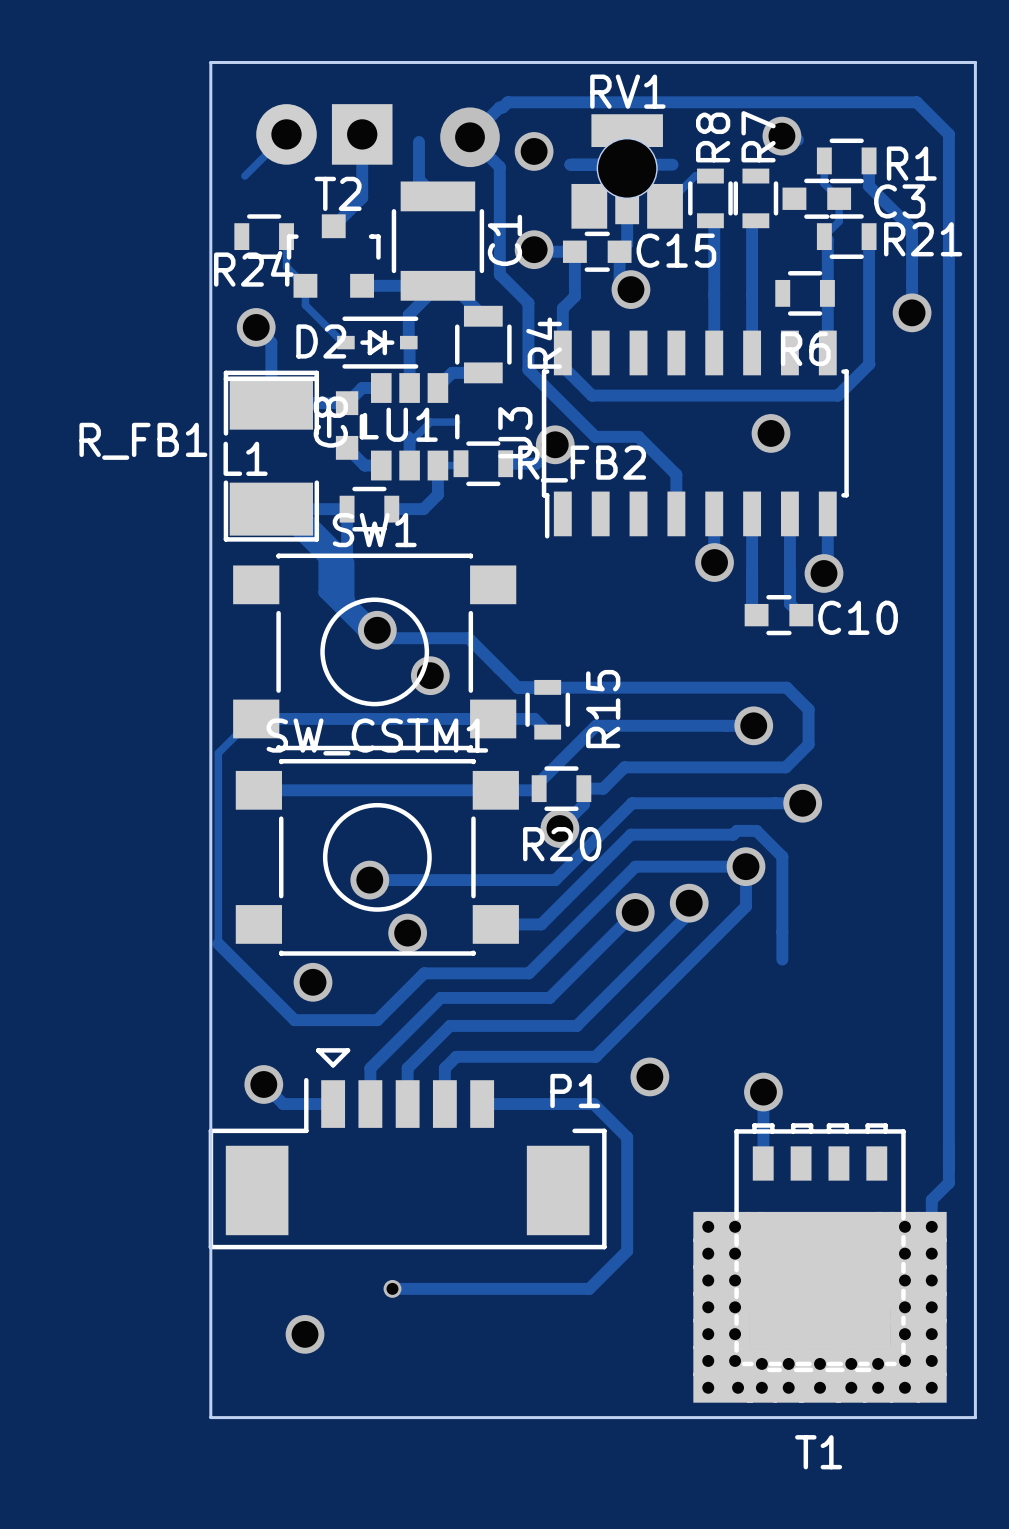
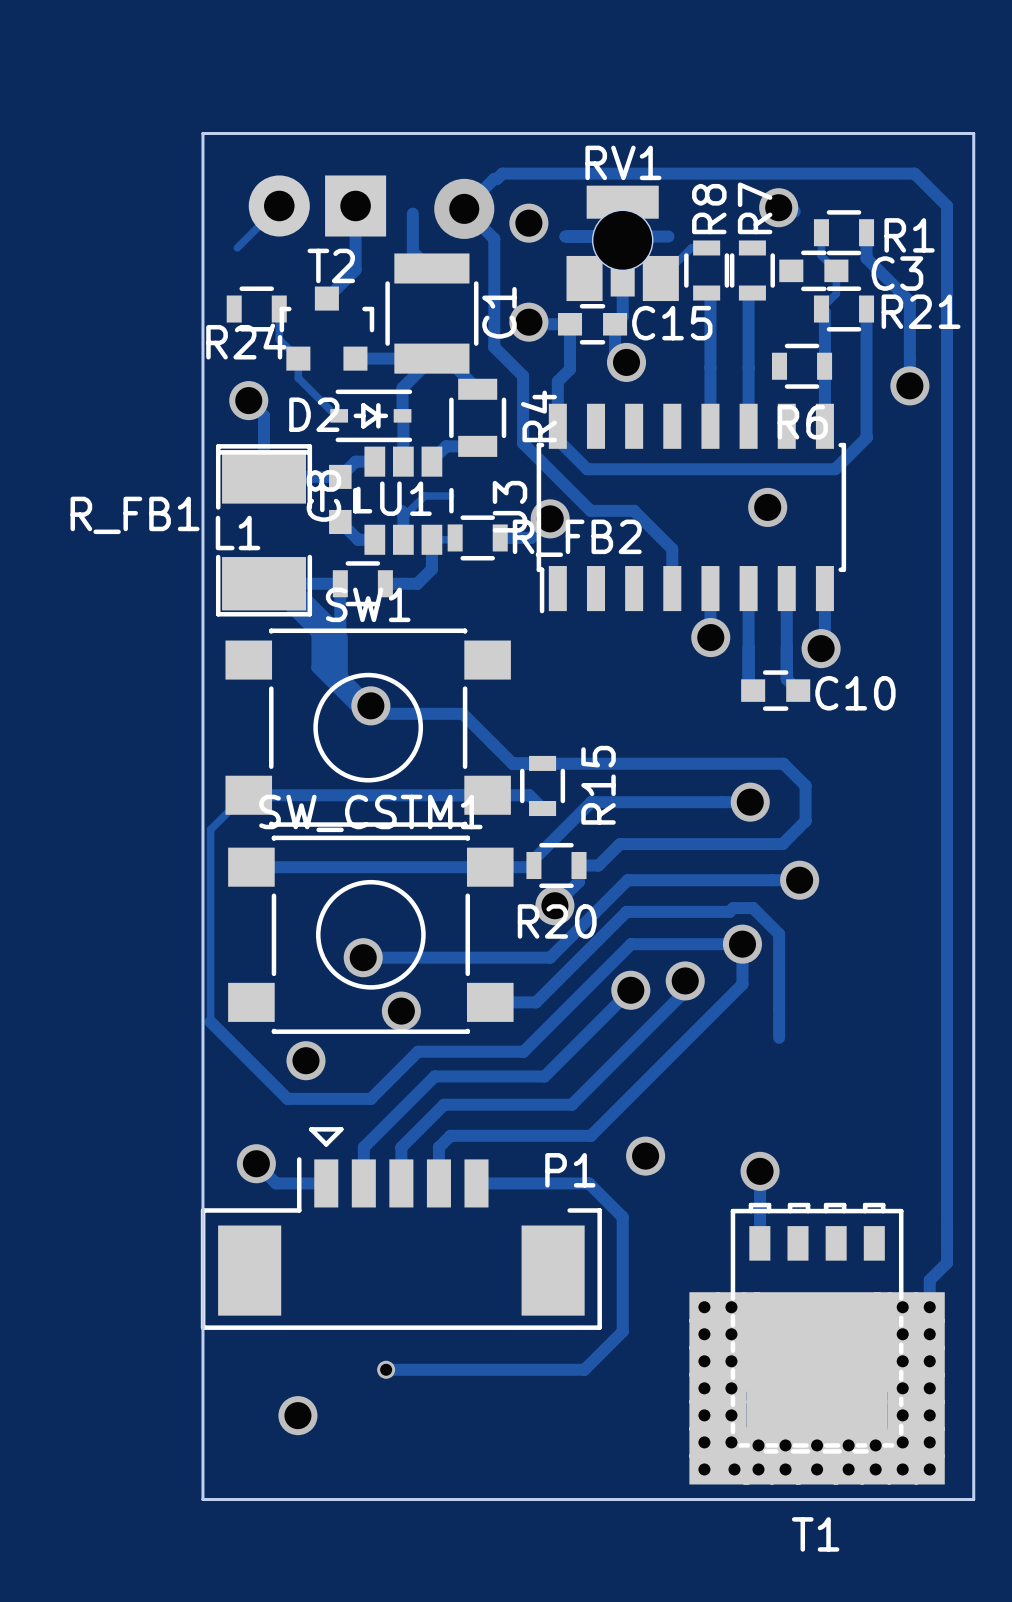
via: (430, 675) -> none

